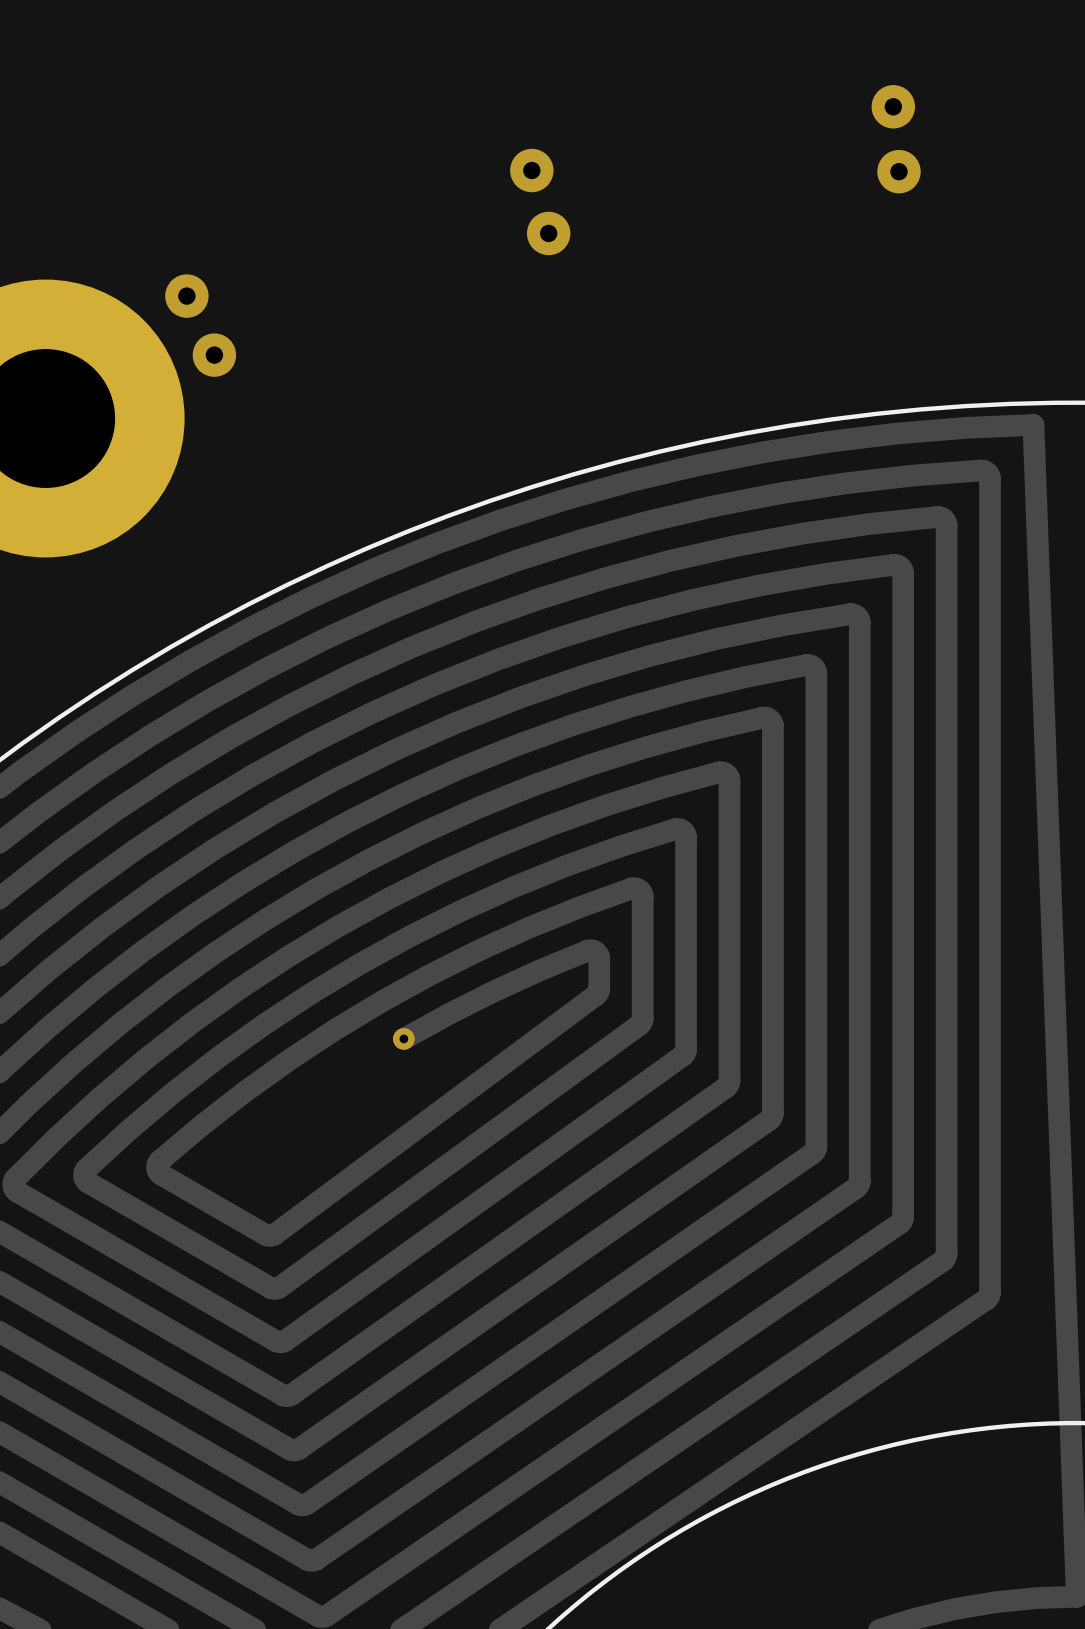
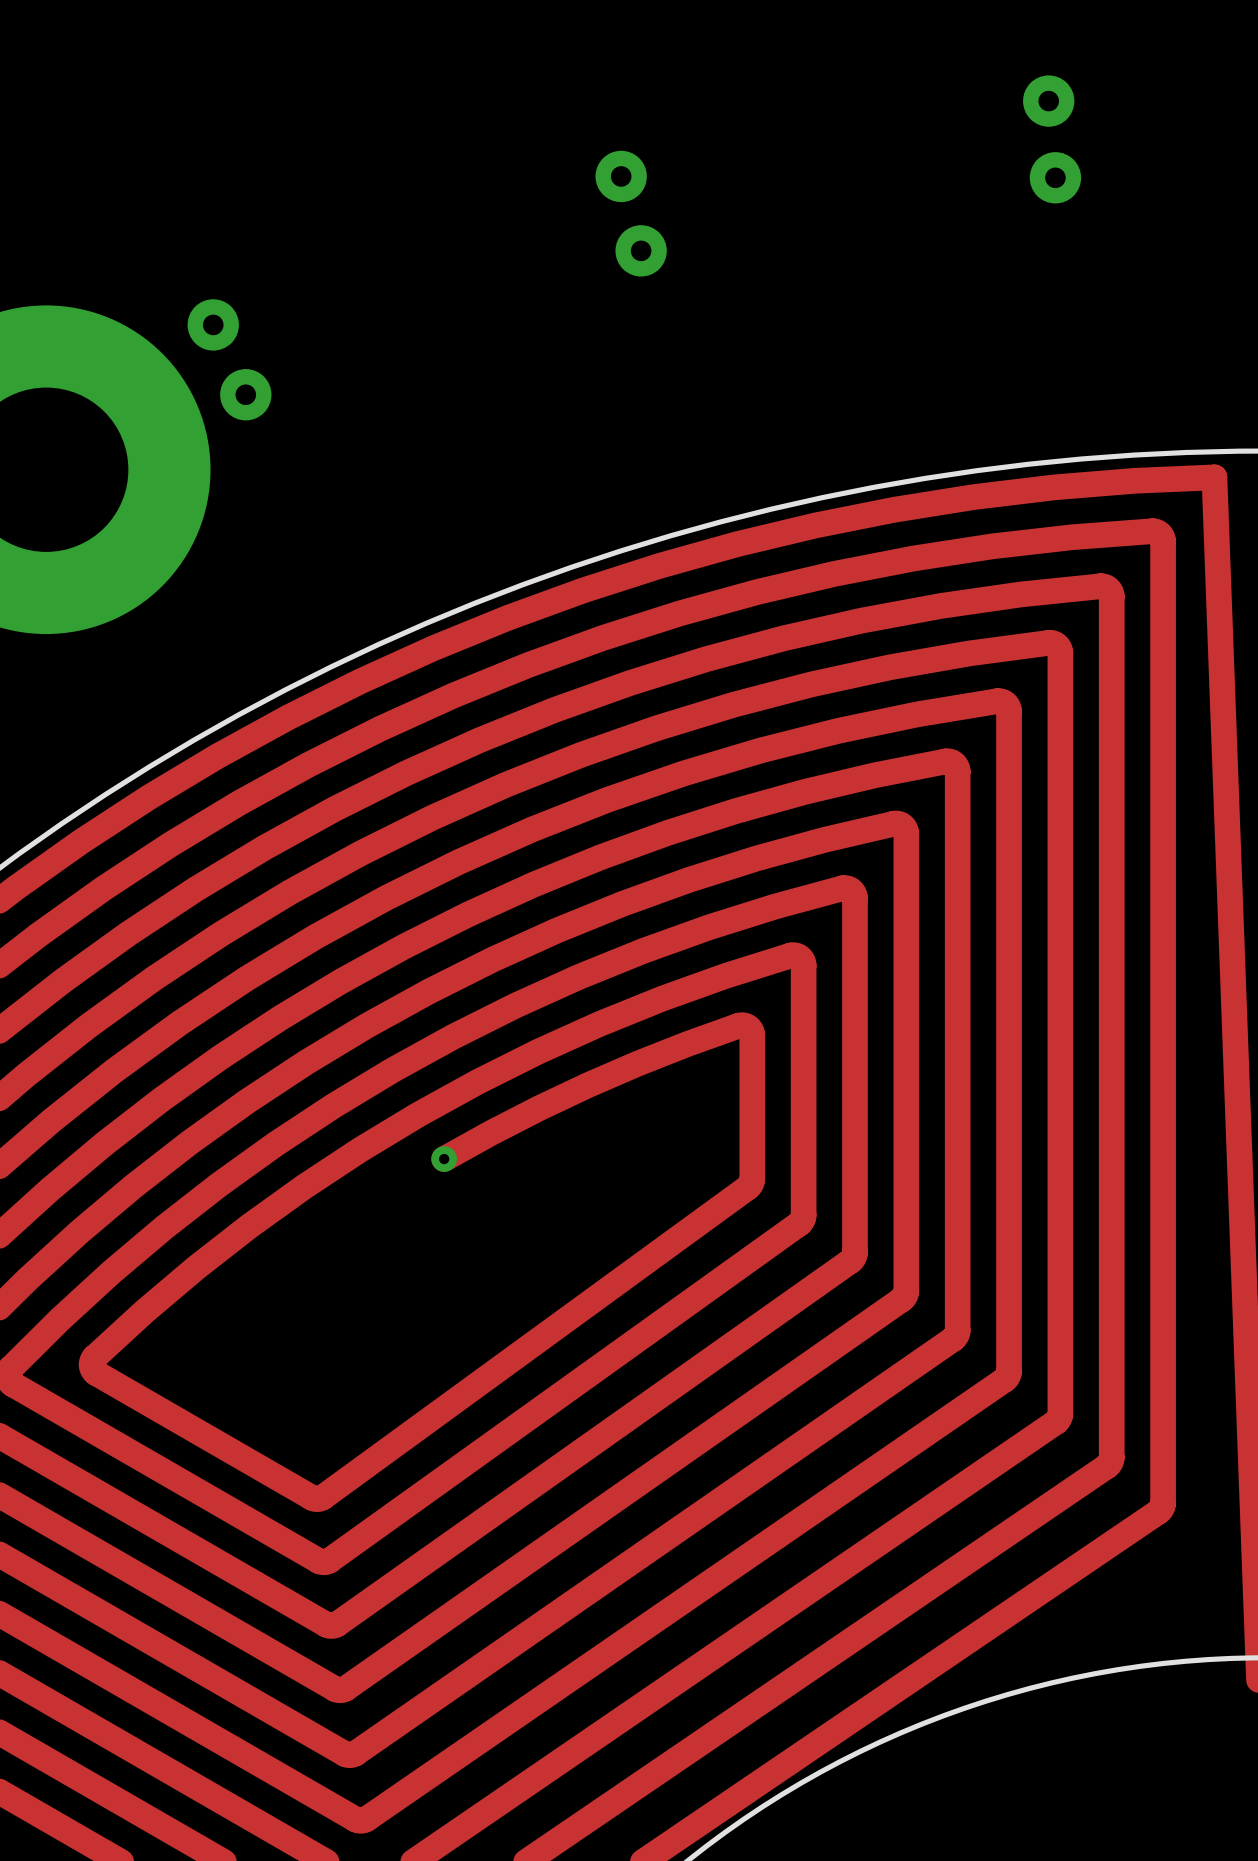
track: (631, 888) (528, 927) (479, 950) (382, 1001) (335, 1029) (245, 1091) (159, 1160) (157, 1165) (157, 1170) (265, 1234) (273, 1235) (596, 994) (599, 988) (598, 955) (594, 951) (588, 950) (540, 970) (448, 1014) (403, 1038) -> (738, 1025) (637, 1063) (588, 1085) (491, 1132) (444, 1159)
via position: (403, 1038) -> (444, 1159)

